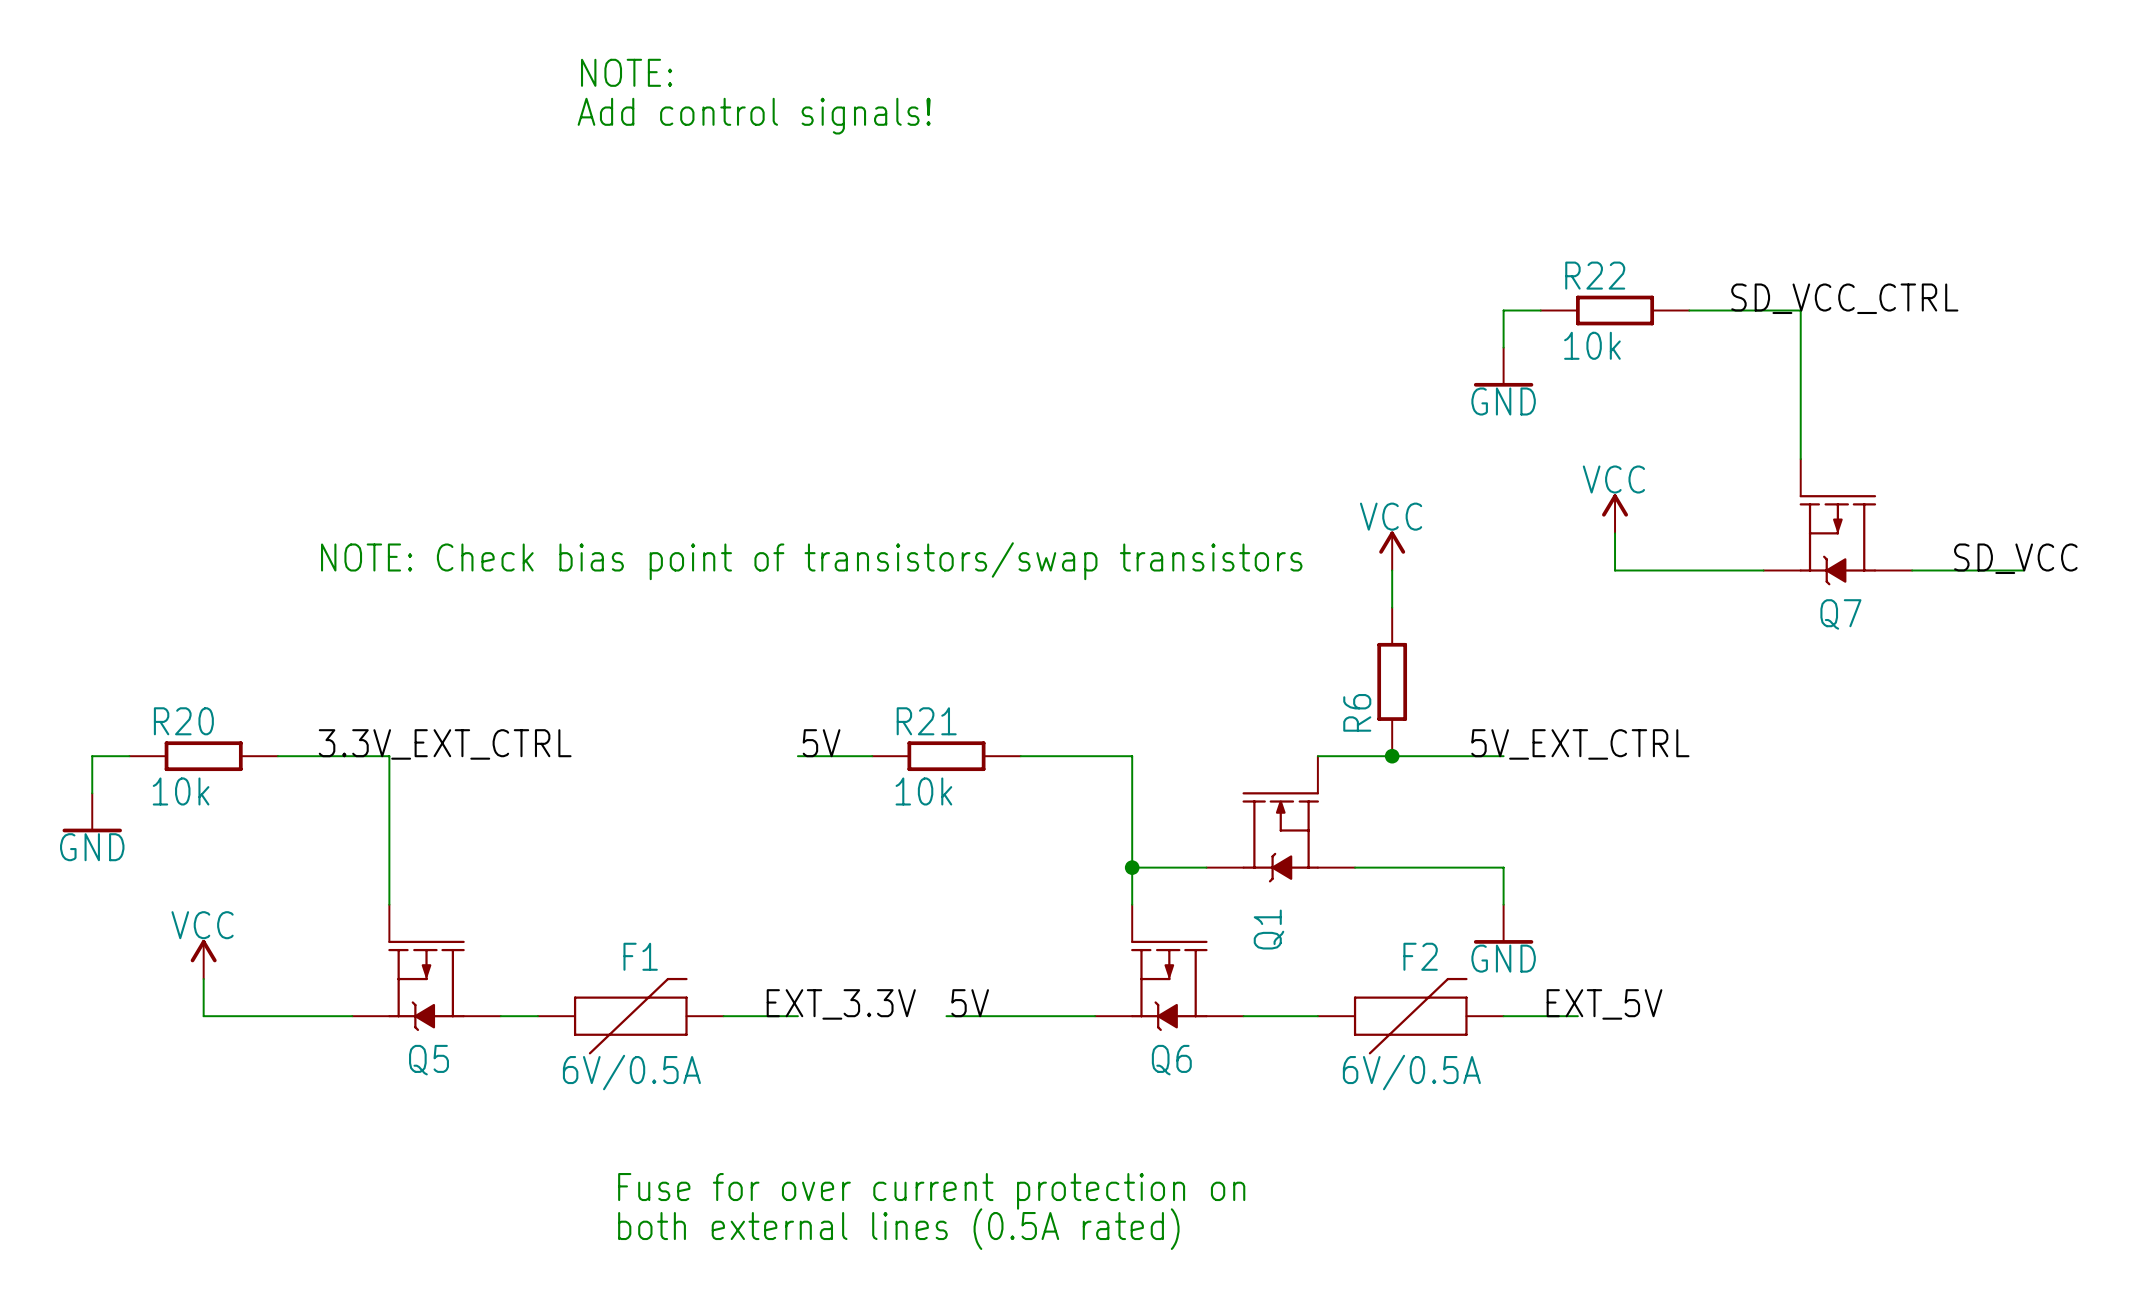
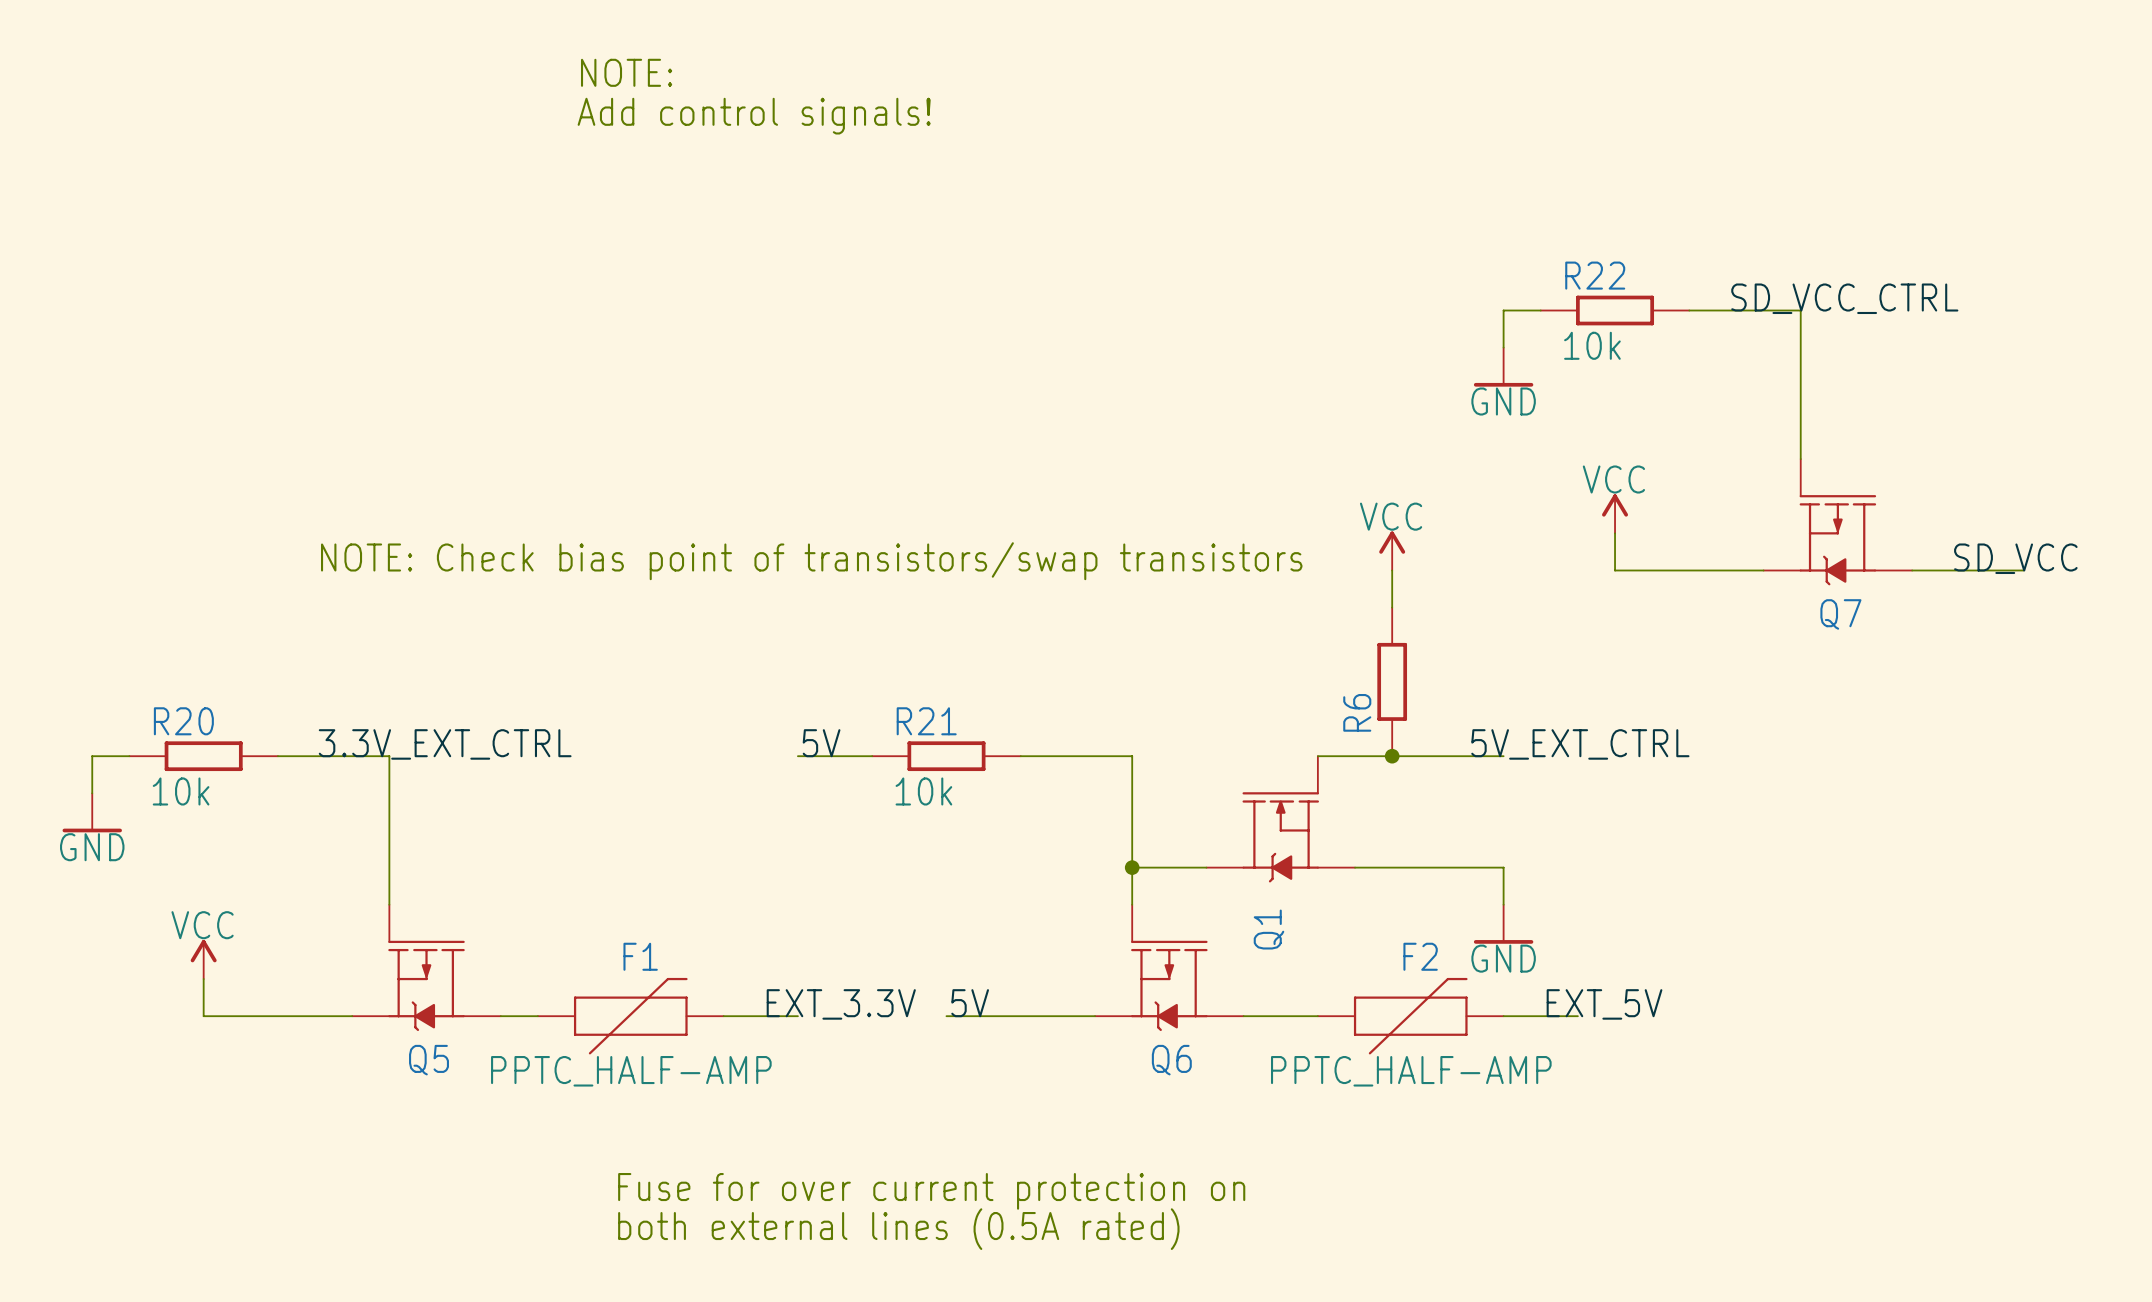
F1 value: 6V/0.5A (631, 1072) -> PPTC_HALF-AMP (631, 1071)
F2 value: 6V/0.5A (1411, 1072) -> PPTC_HALF-AMP (1411, 1071)

